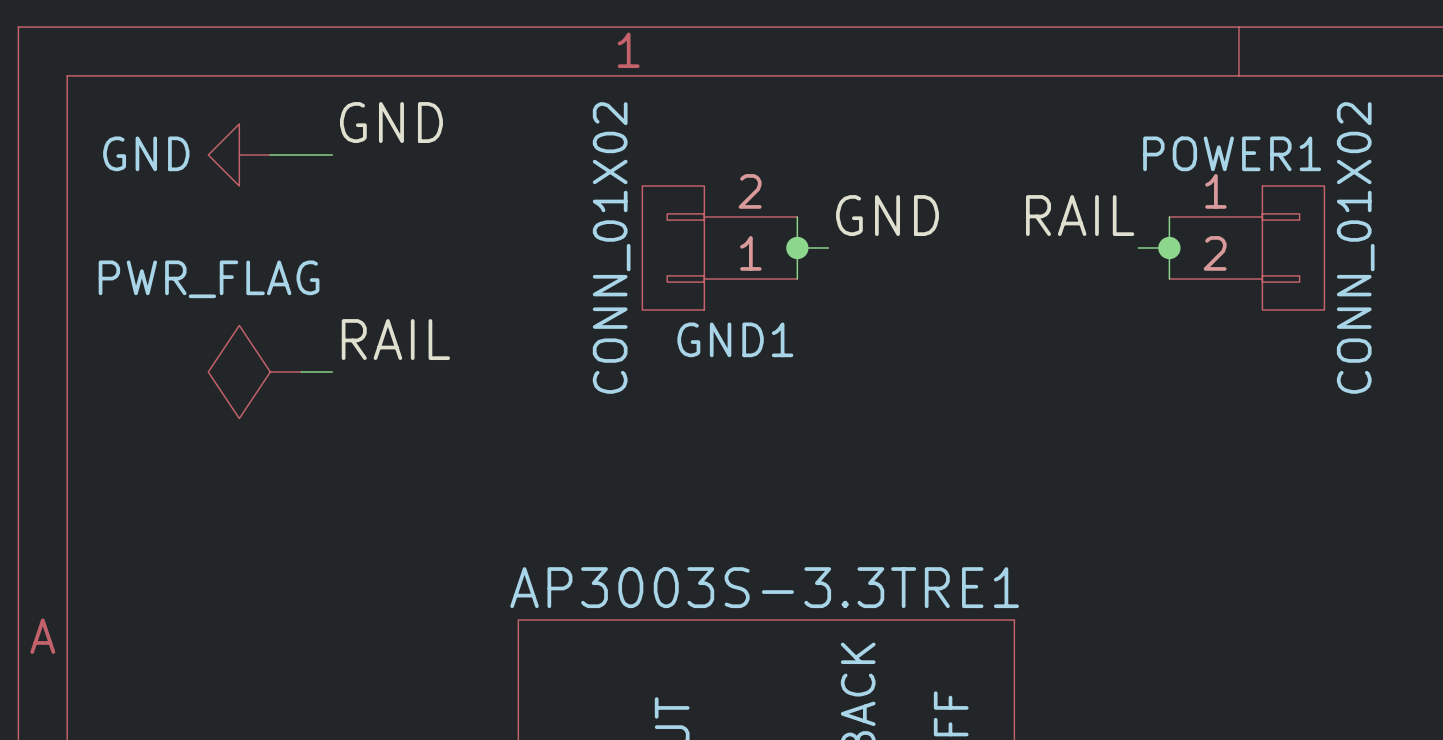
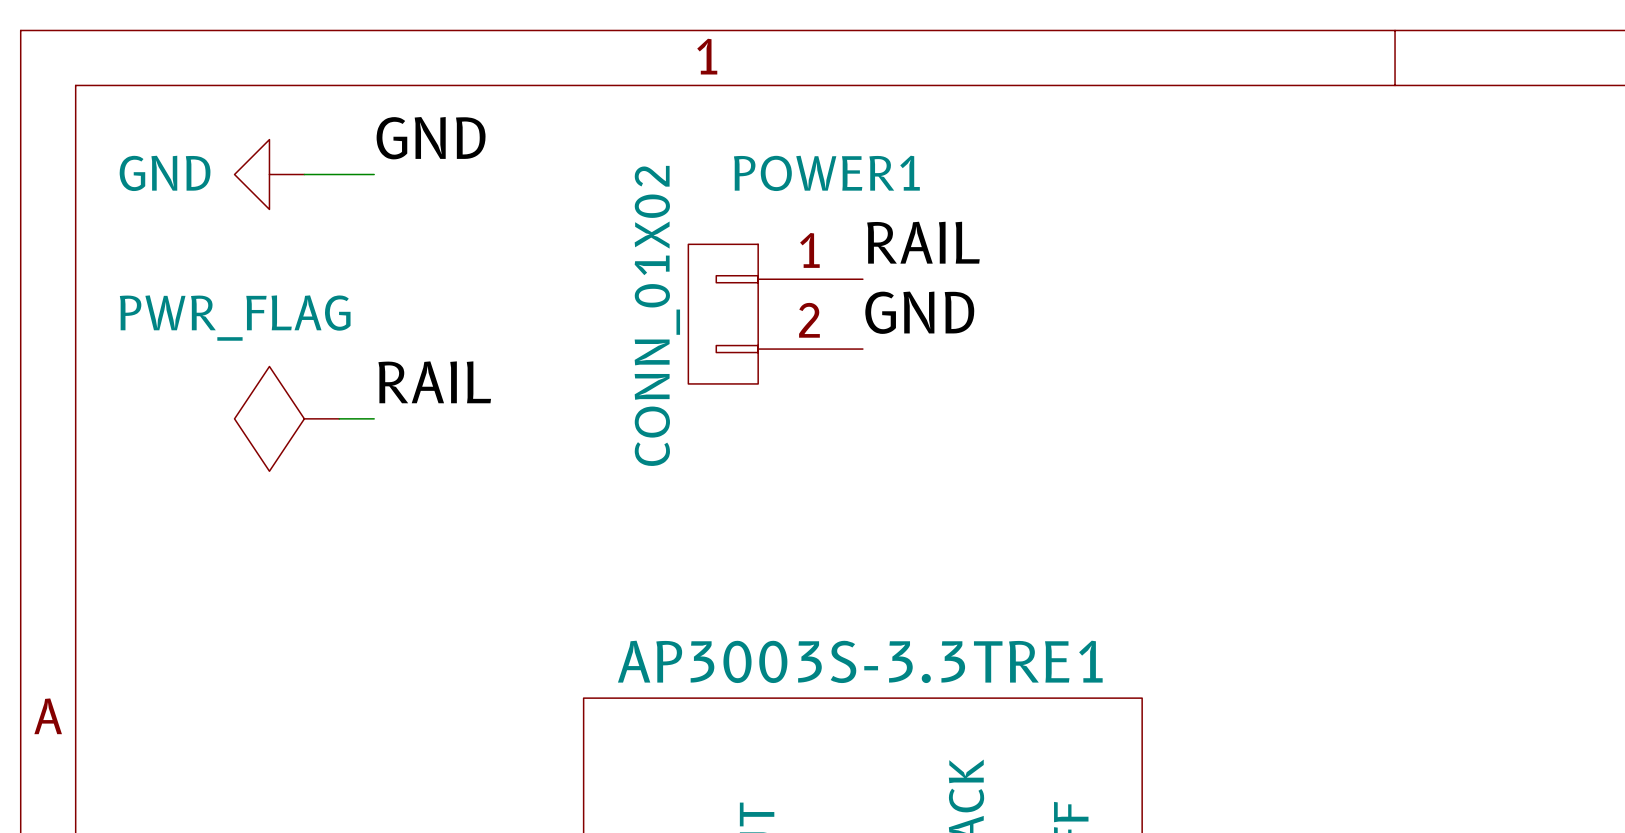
label position: GND (887, 215) -> GND (919, 312)
label position: RAIL (1080, 215) -> RAIL (923, 242)
wire: (797, 216) (797, 279) -> none
wire: (1169, 216) (1169, 279) -> none
GND1: CONN_01X02 (719, 247) -> none
wire: (797, 247) (828, 247) -> none
junction: (797, 247) -> none
wire: (1138, 247) (1169, 247) -> none
junction: (1169, 247) -> none
POWER1 position: (1246, 247) -> (775, 314)
POWER1 flip: as is (1293, 247) -> left-right (723, 314)

